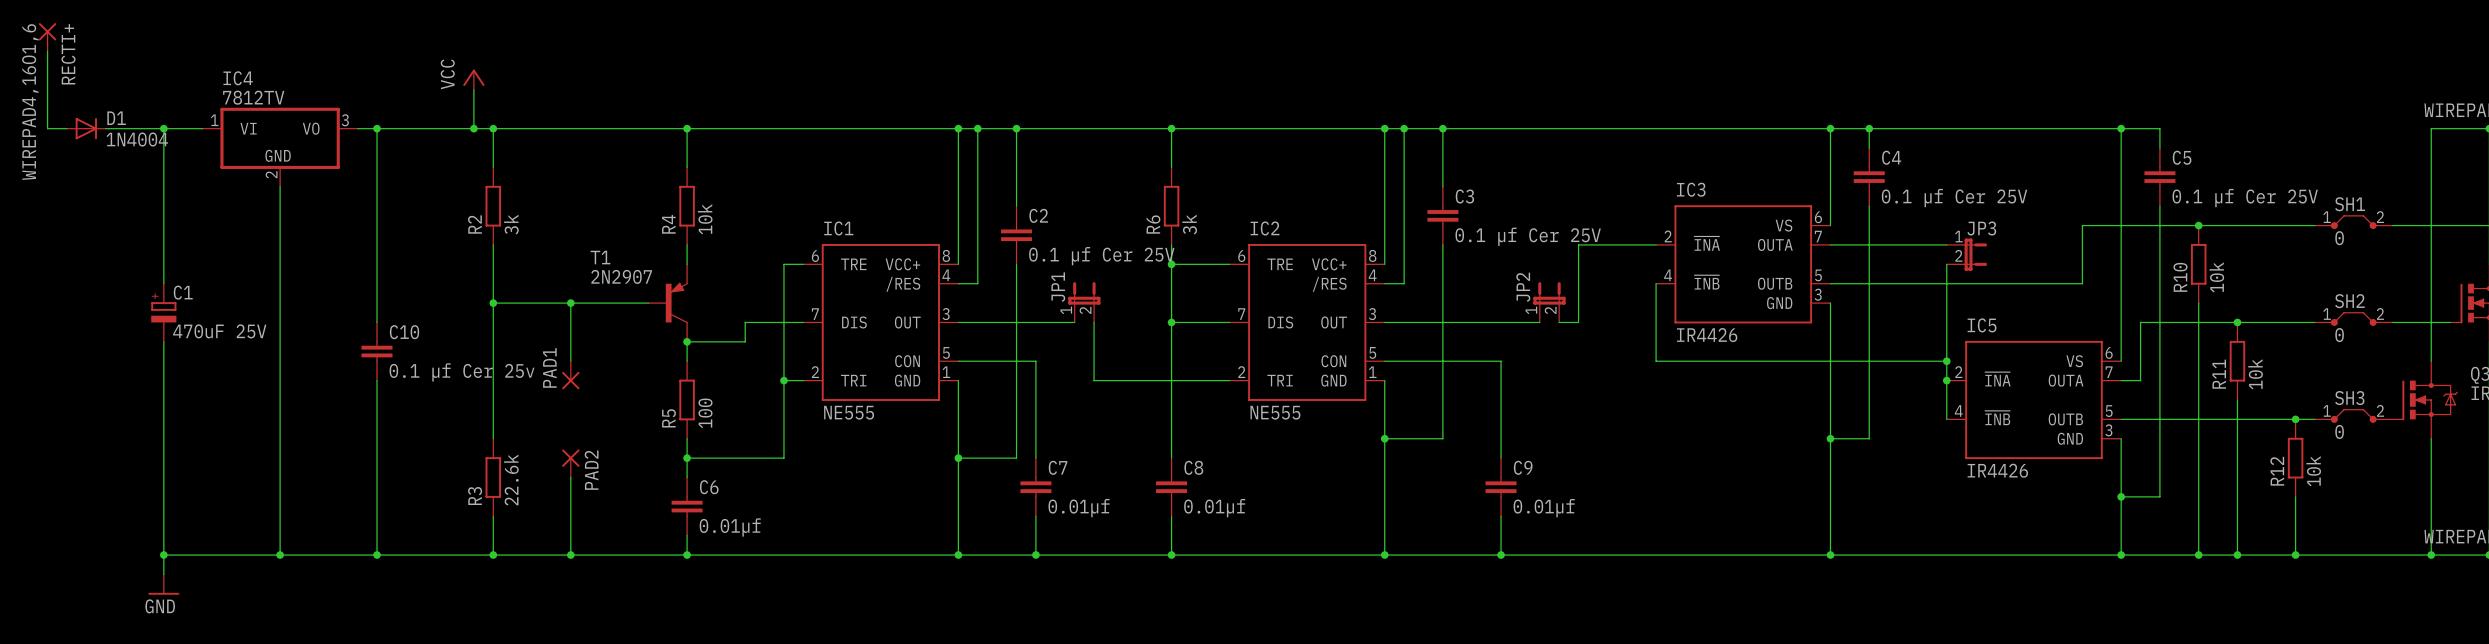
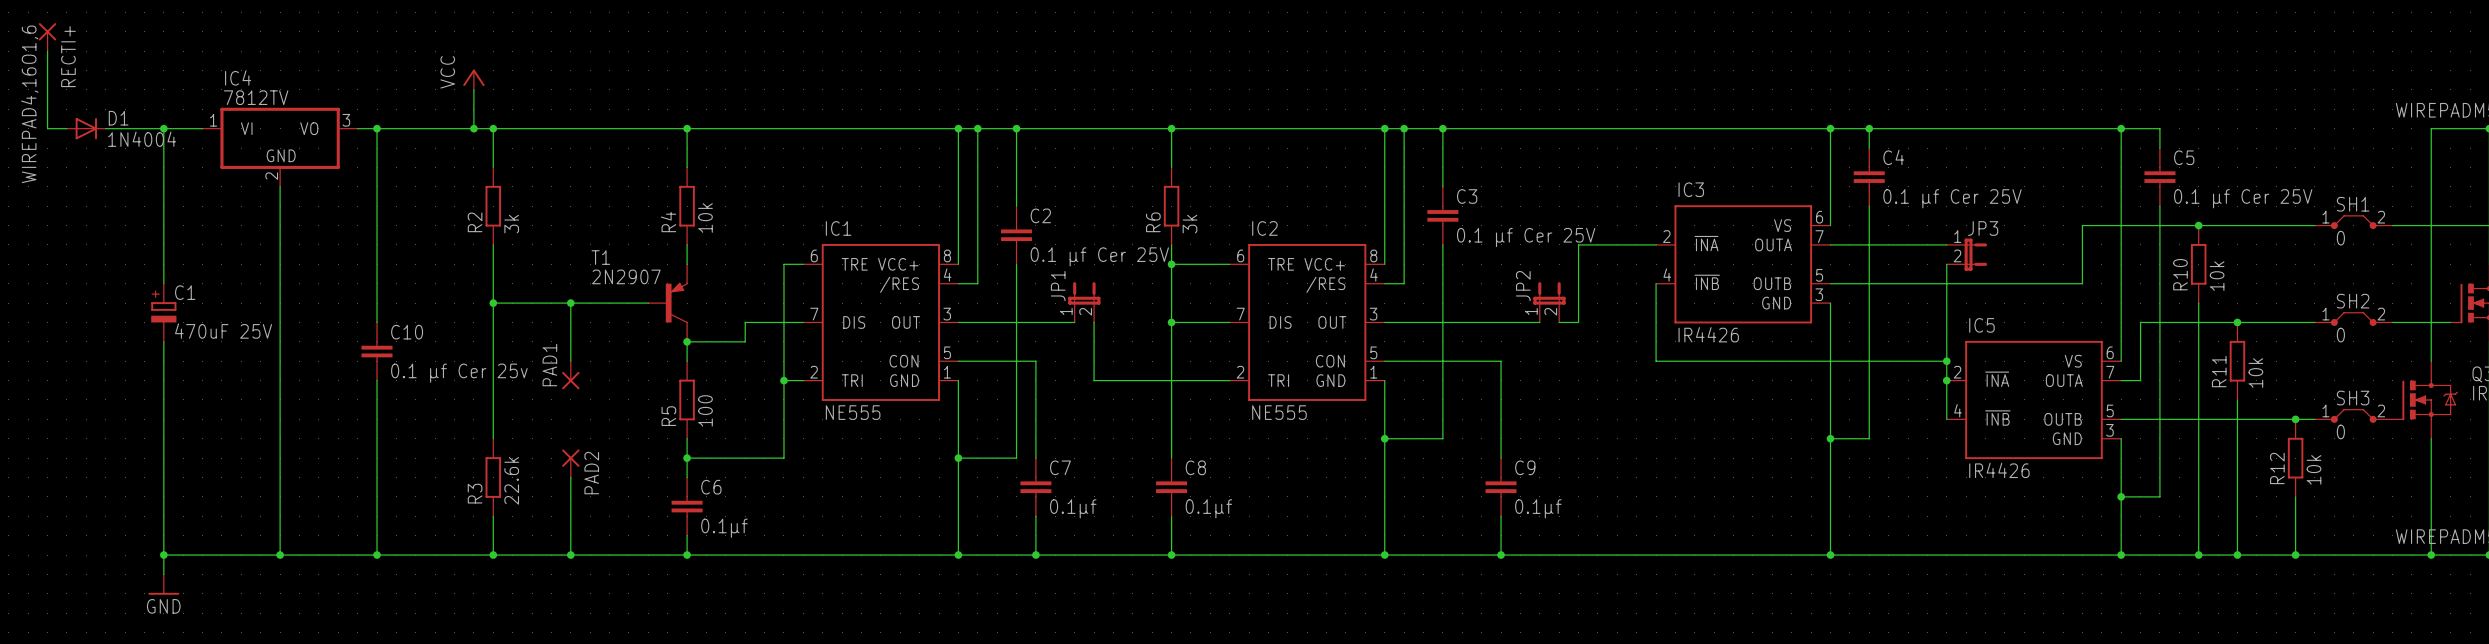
C7 value: 0.01µf (1079, 508) -> 0.1µf (1073, 508)
C8 value: 0.01µf (1214, 508) -> 0.1µf (1208, 508)
C9 value: 0.01µf (1544, 508) -> 0.1µf (1538, 508)
C6 value: 0.01µf (730, 527) -> 0.1µf (724, 528)

